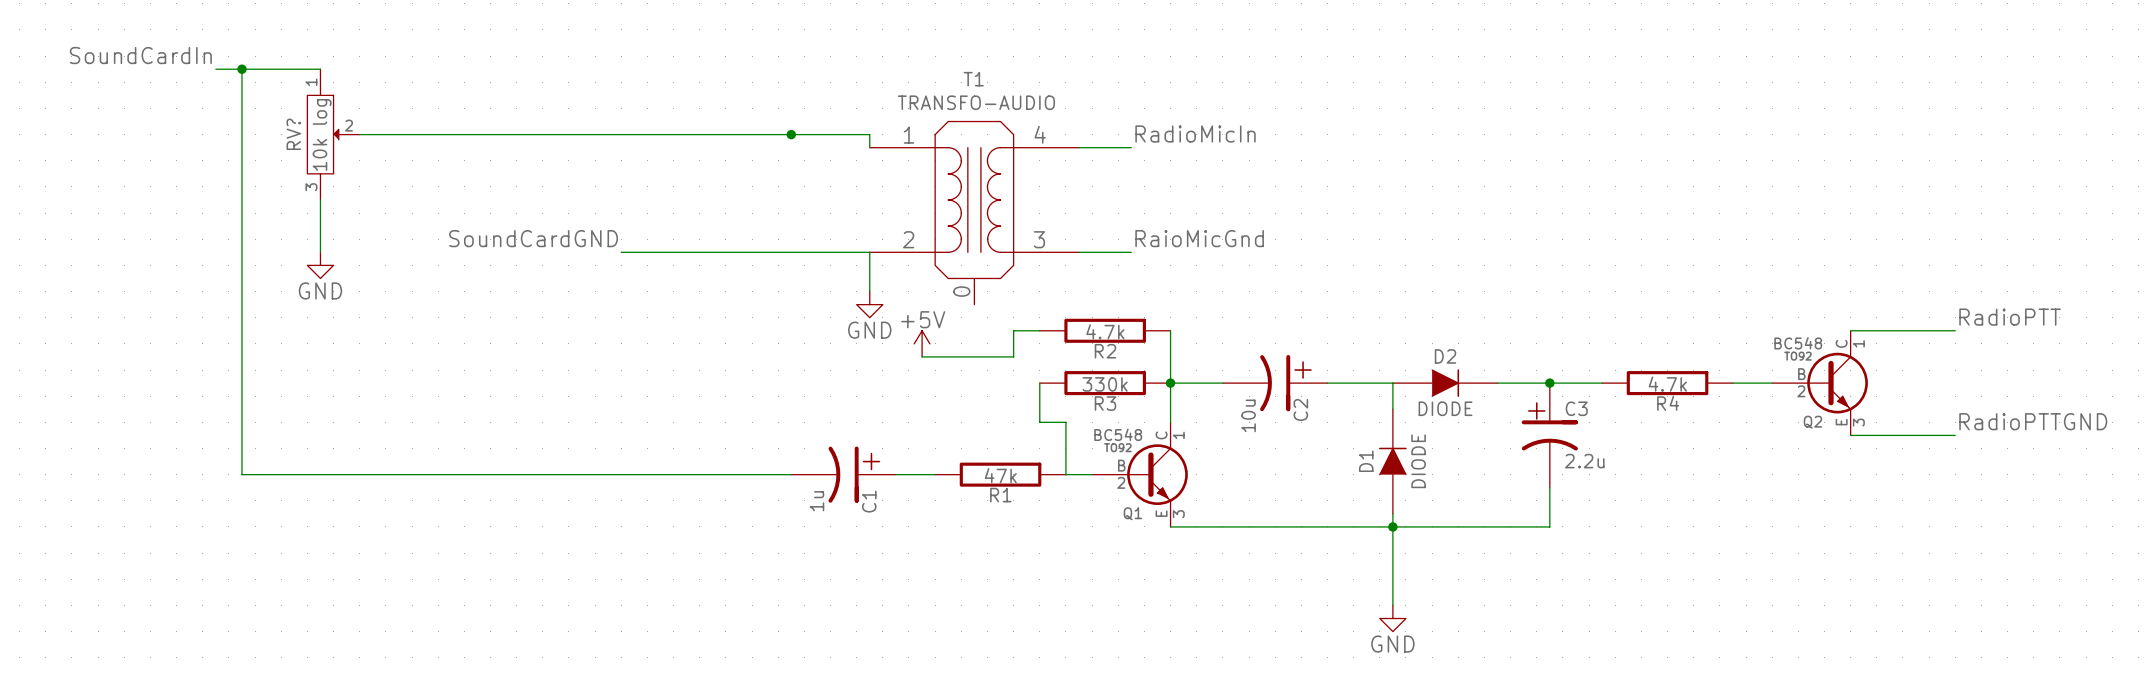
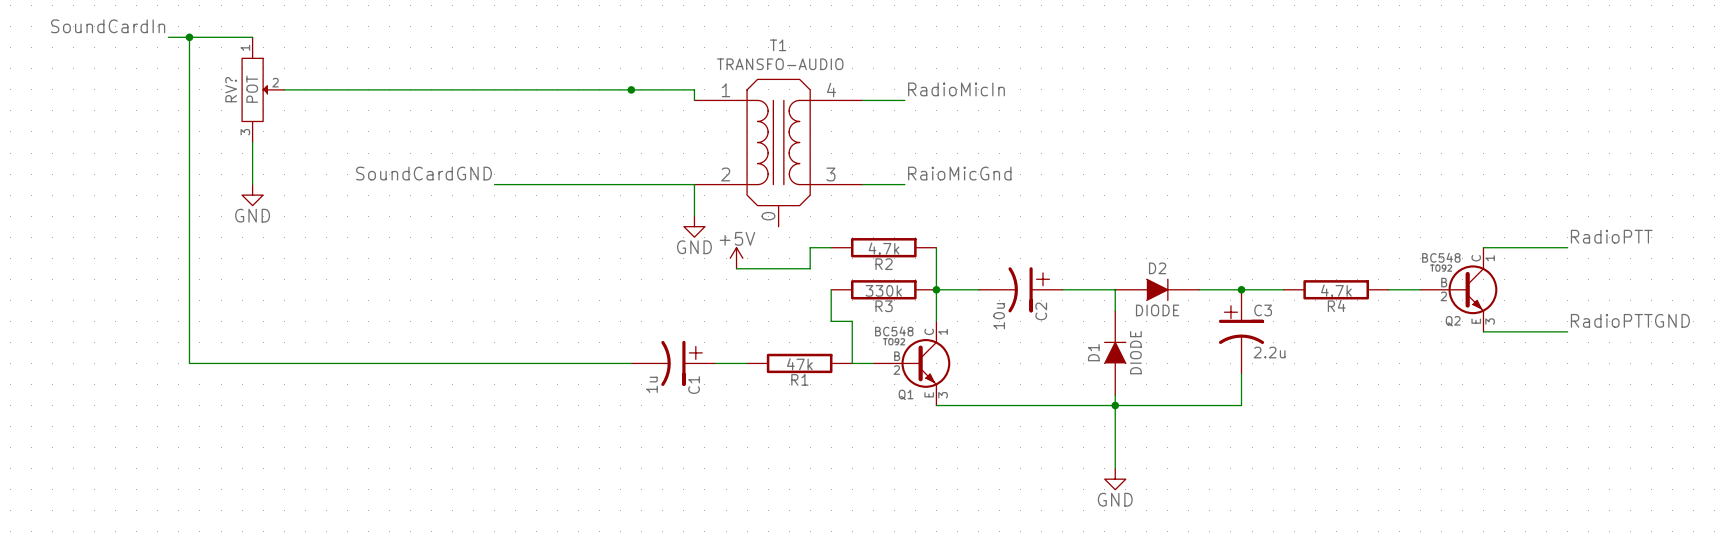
RV? value: 10k log (322, 134) -> POT (252, 89)

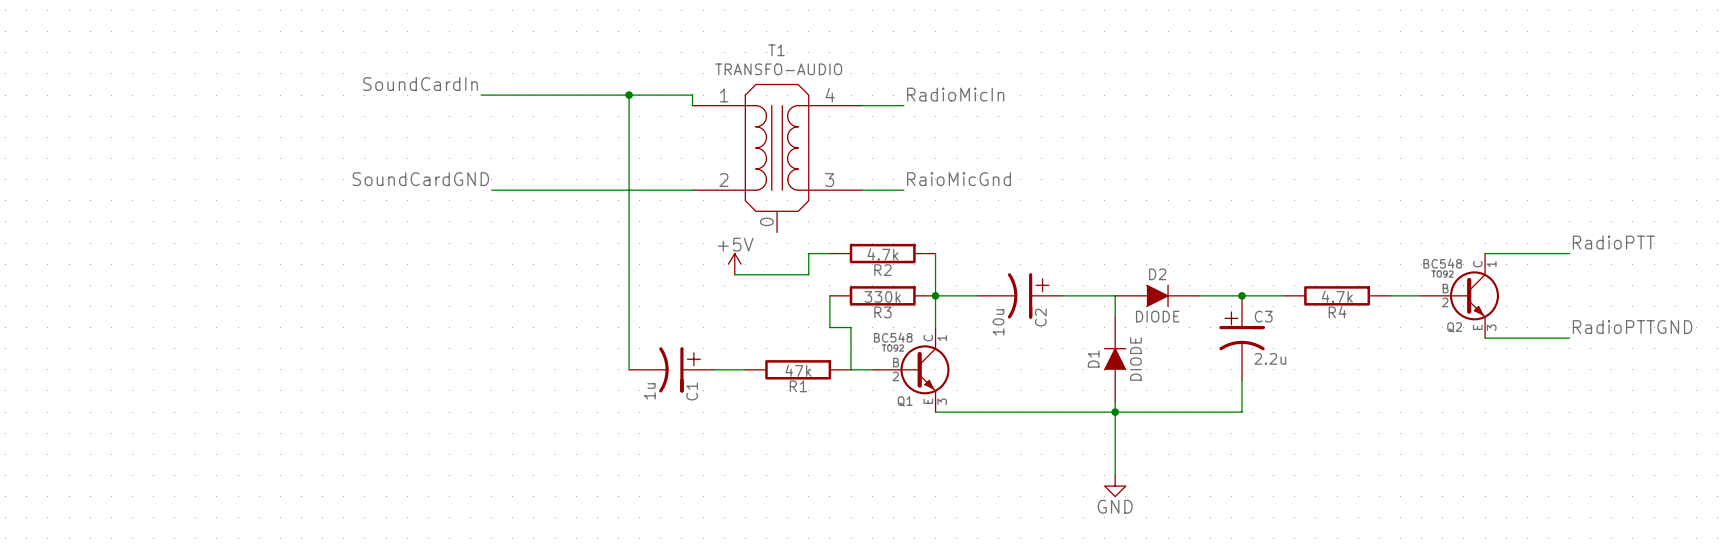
label: SoundCardIn (108, 26) -> none
wire: (168, 37) (252, 37) -> none
wire: (189, 37) (189, 363) (631, 363) -> (629, 95) (629, 369)
junction: (189, 37) -> none
label: none -> SoundCardIn (420, 84)
RV?: POT (263, 89) -> none
wire: (284, 89) (484, 89) -> none
wire: (252, 142) (252, 184) -> none
wire: (694, 184) (694, 216) -> none
power symbol: GND (252, 195) -> none
power symbol: GND (694, 226) -> none

